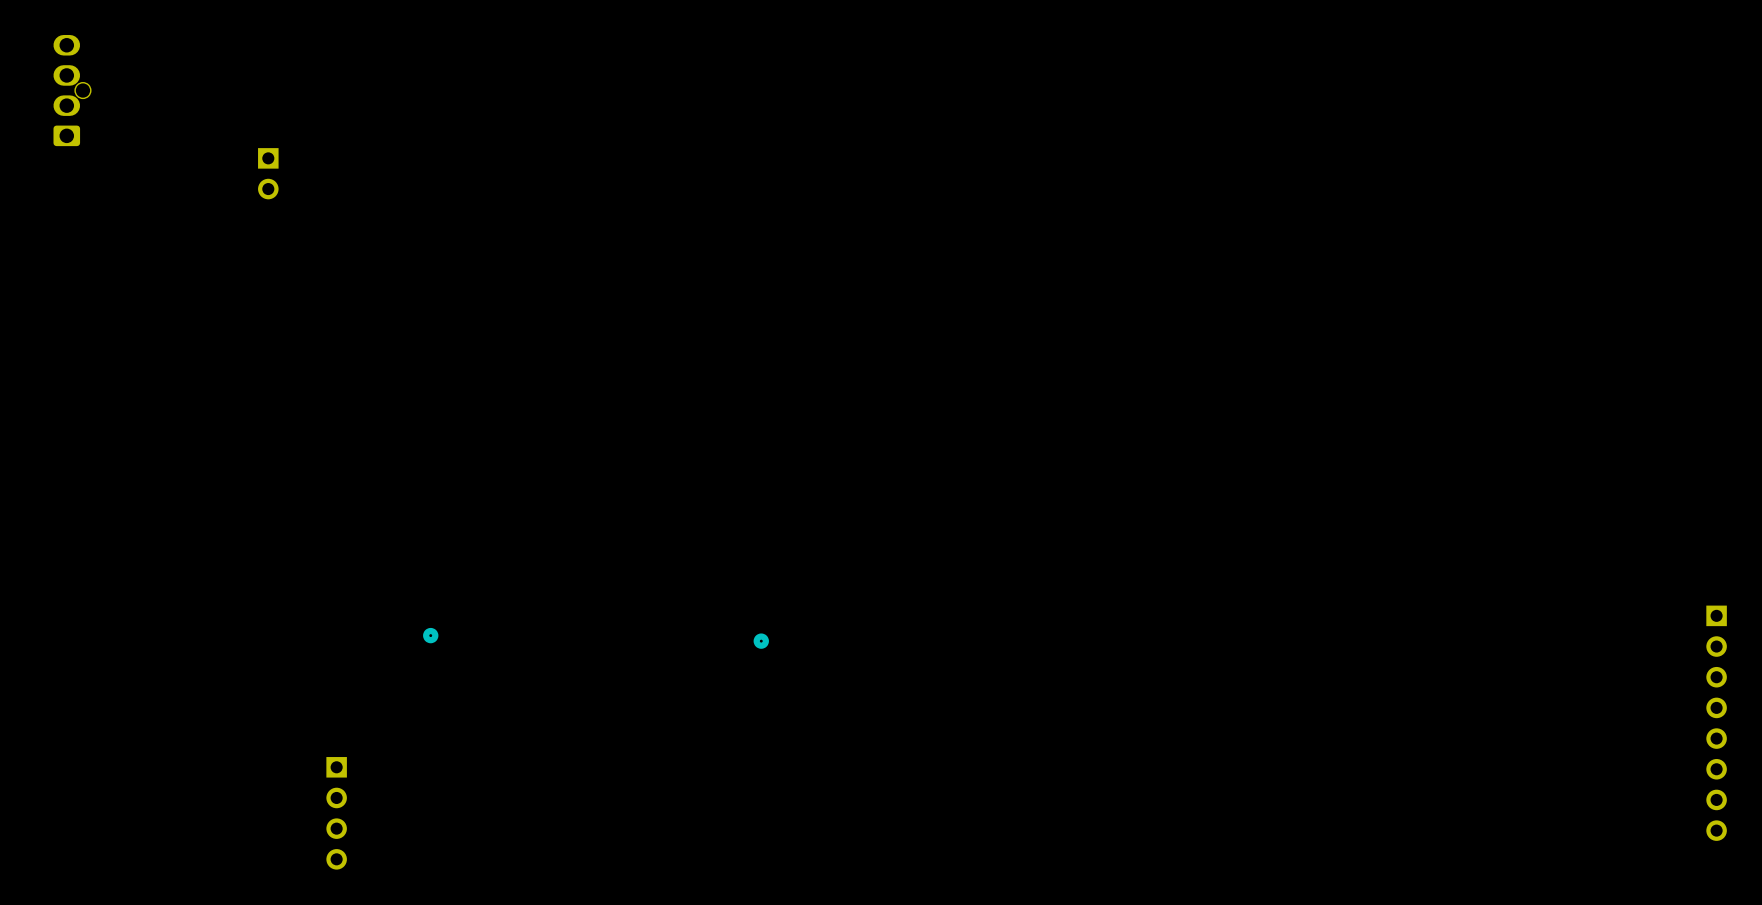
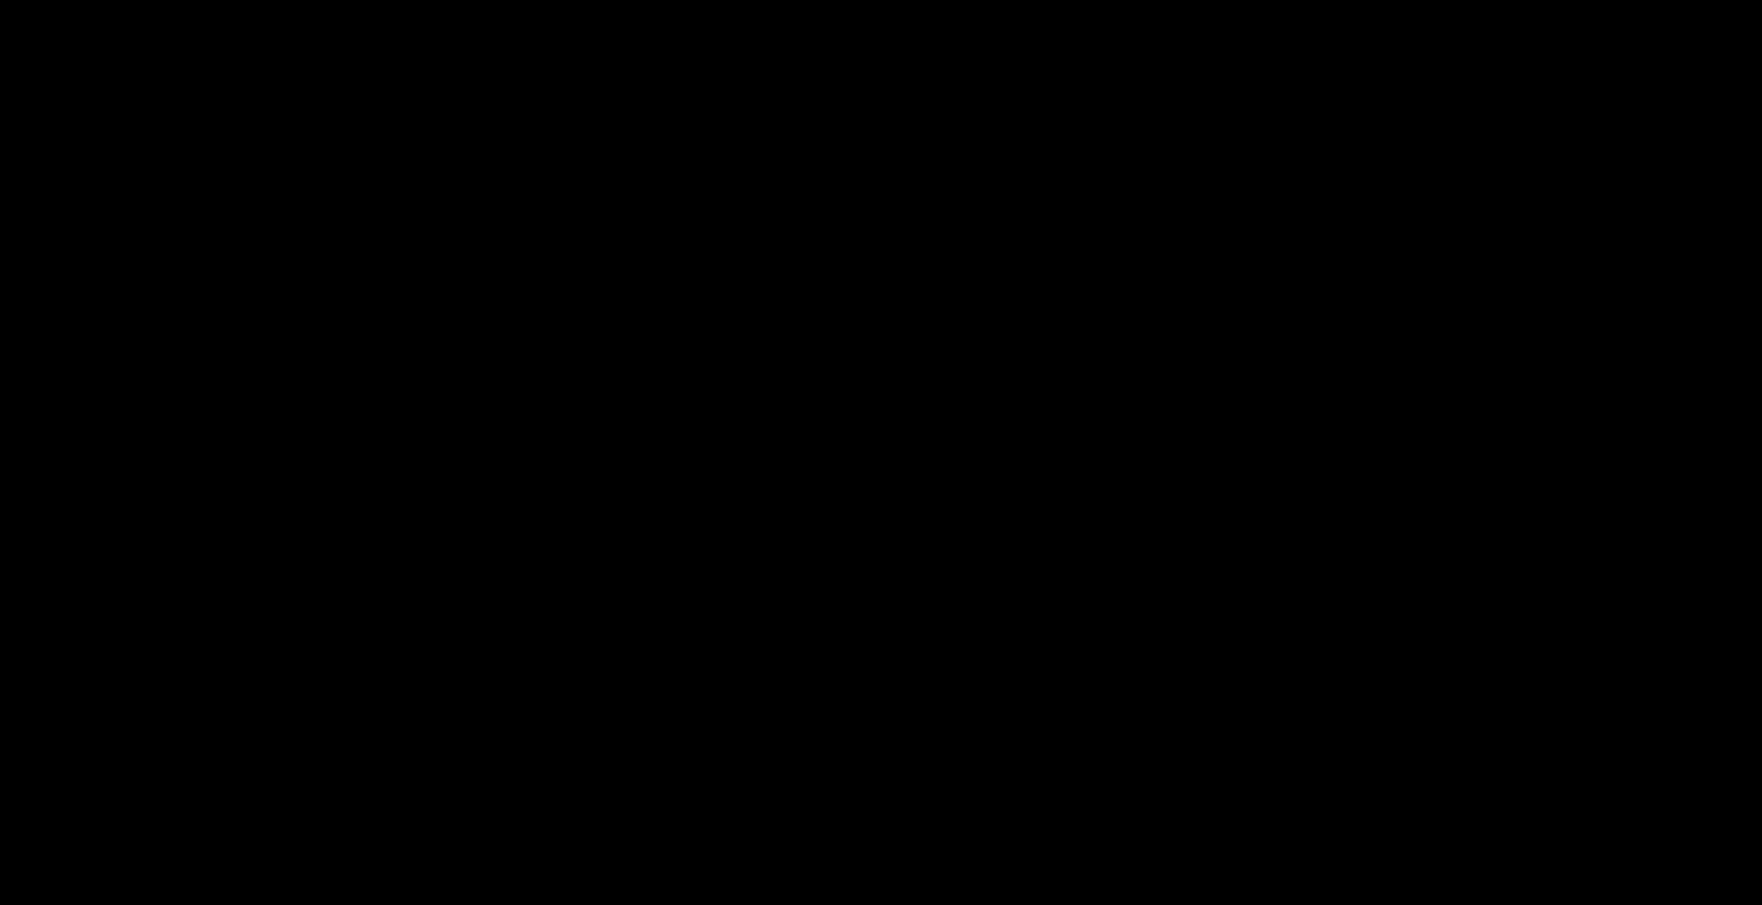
part: (72, 90) -> none
part: (268, 173) -> none
part: (430, 635) -> none
part: (761, 641) -> none
part: (1716, 723) -> none
part: (336, 813) -> none

